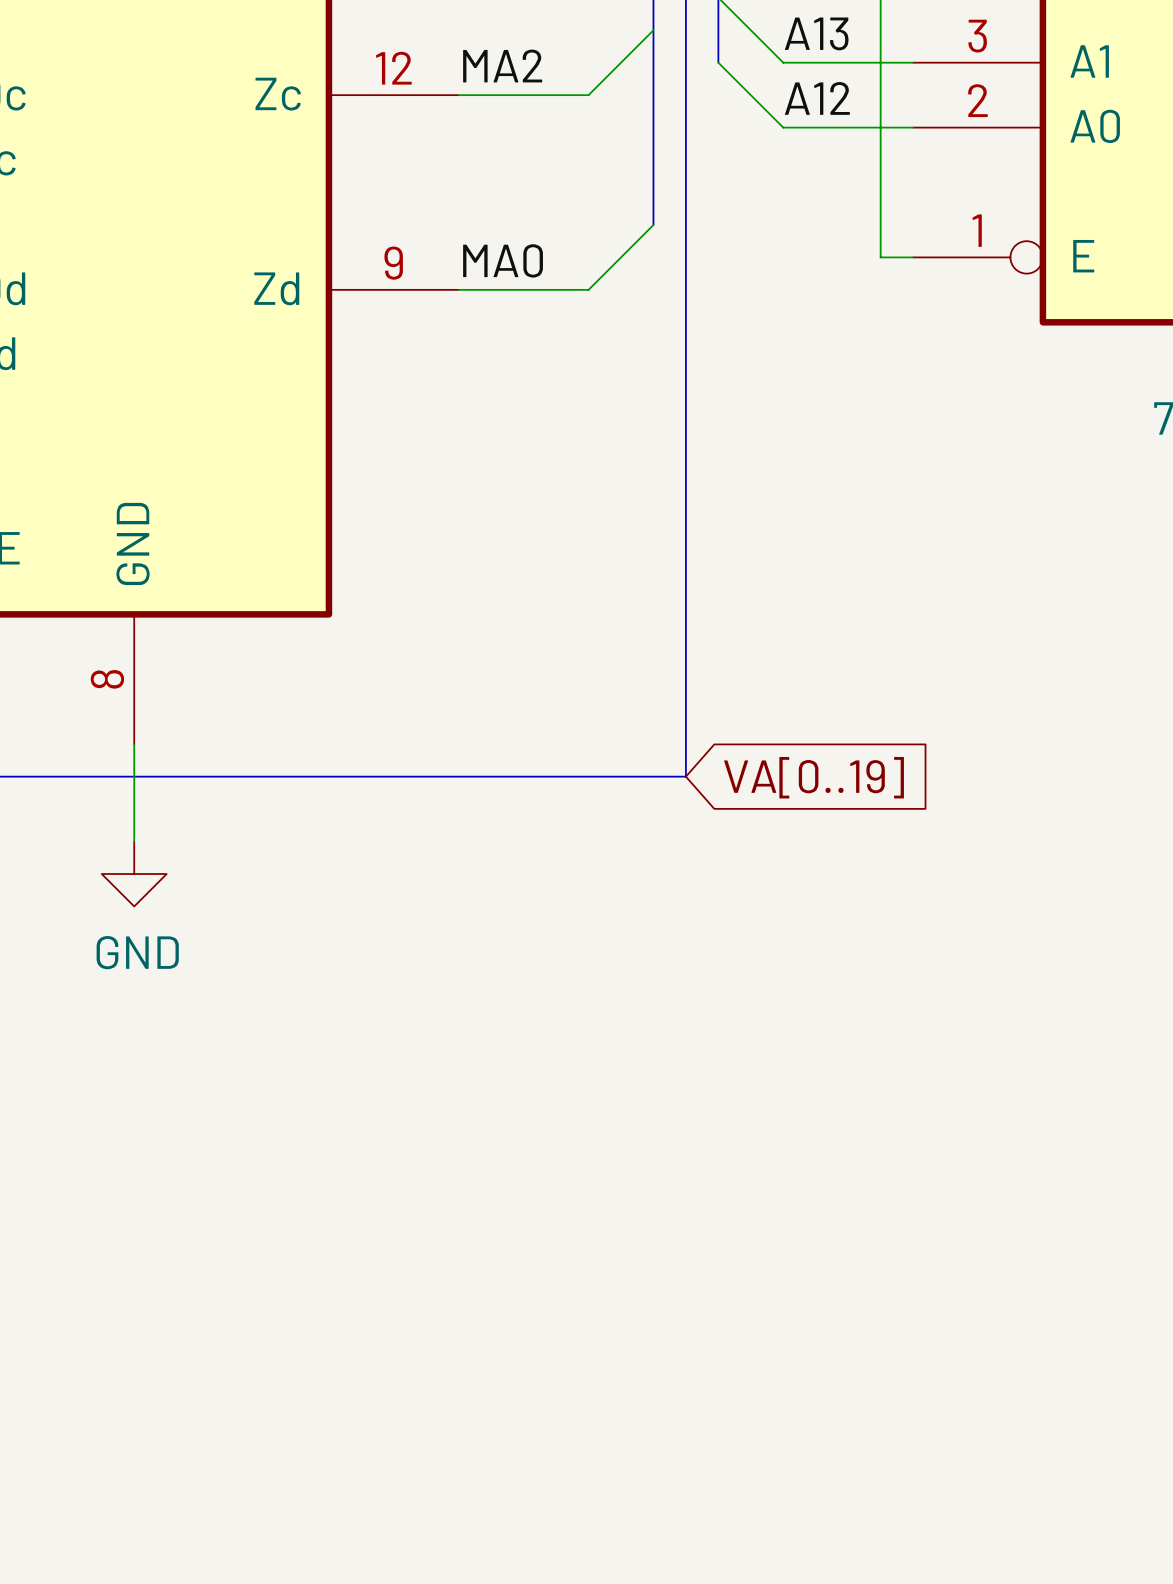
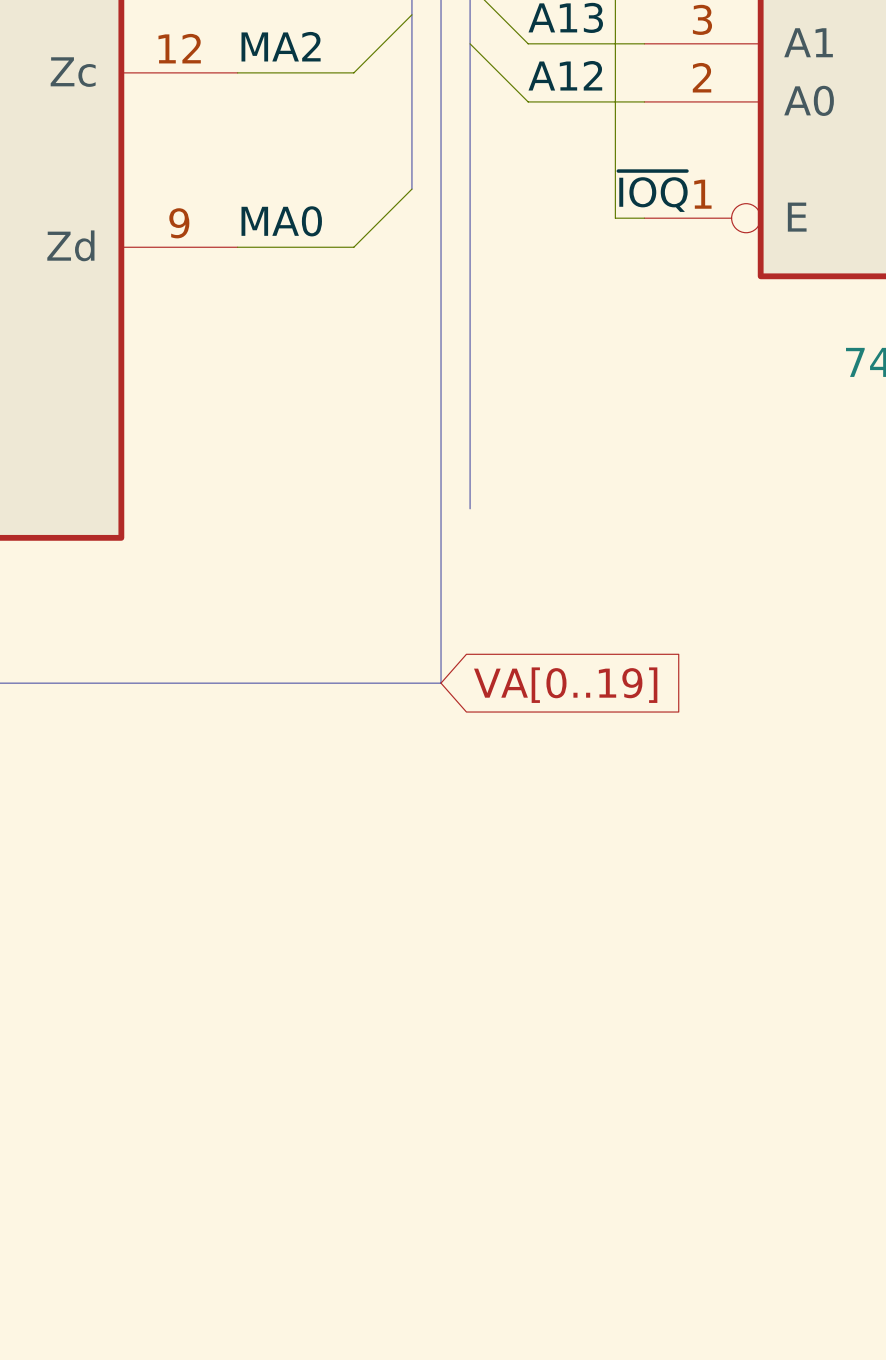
bus: none -> (470, 43) (470, 508)
label: none -> ~{IOQ} (652, 191)

